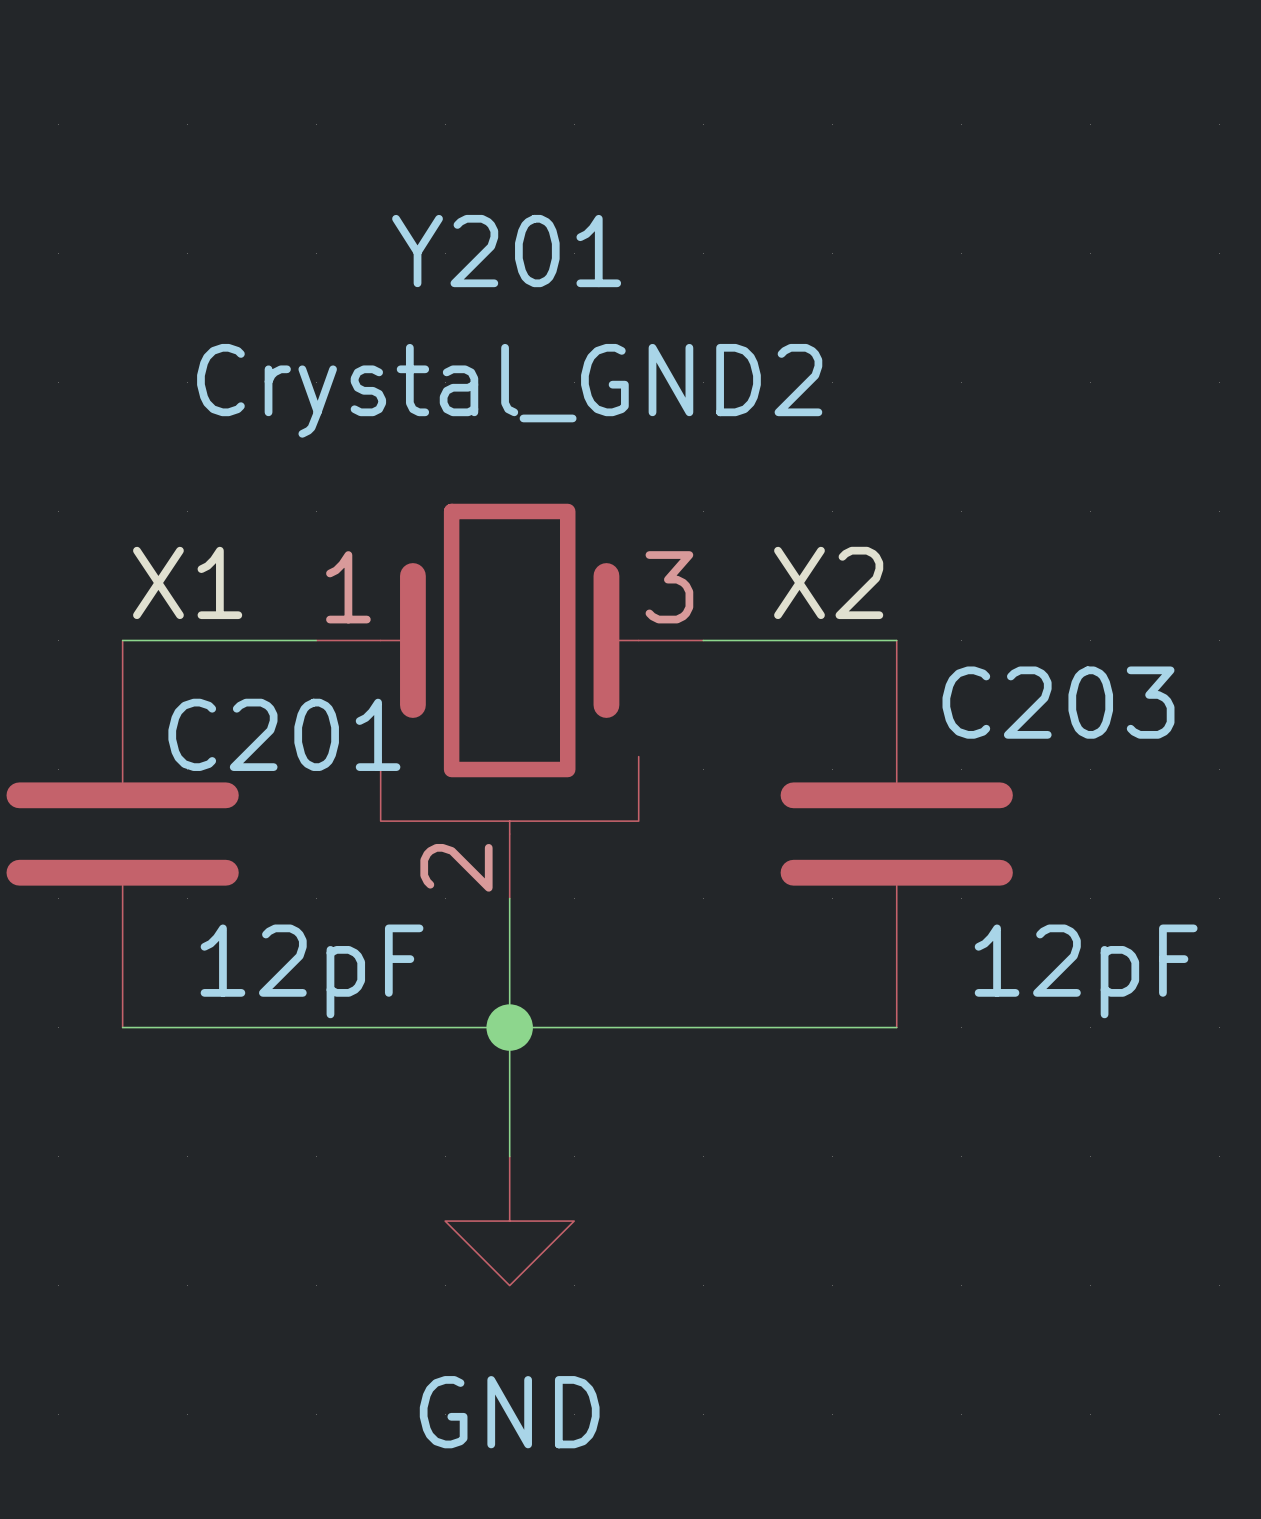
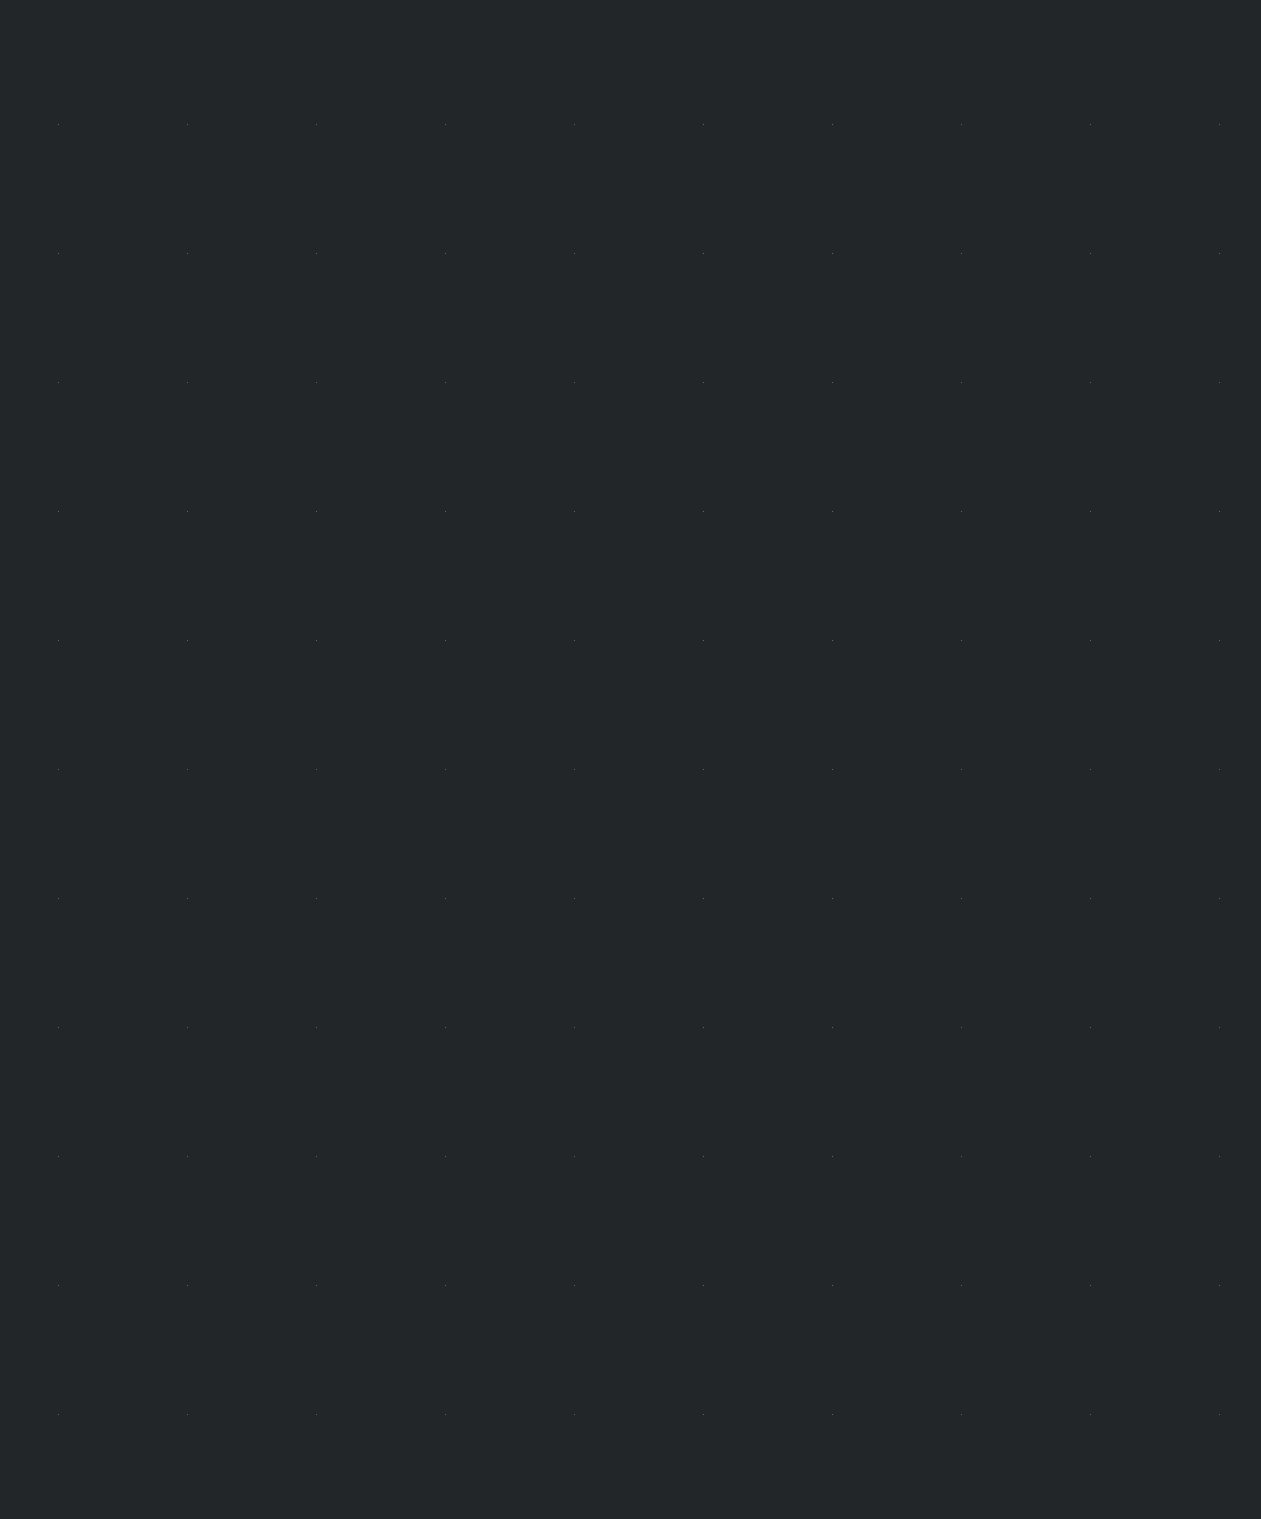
label: X1 (187, 582) -> none
label: X2 (828, 582) -> none
wire: (122, 640) (316, 640) -> none
wire: (703, 640) (896, 640) -> none
Y201: Crystal_GND2 (509, 701) -> none
C201: 12pF (122, 834) -> none
C203: 12pF (896, 834) -> none
wire: (509, 898) (509, 1156) -> none
wire: (122, 1027) (896, 1027) -> none
junction: (509, 1027) -> none
power symbol: GND (509, 1221) -> none

